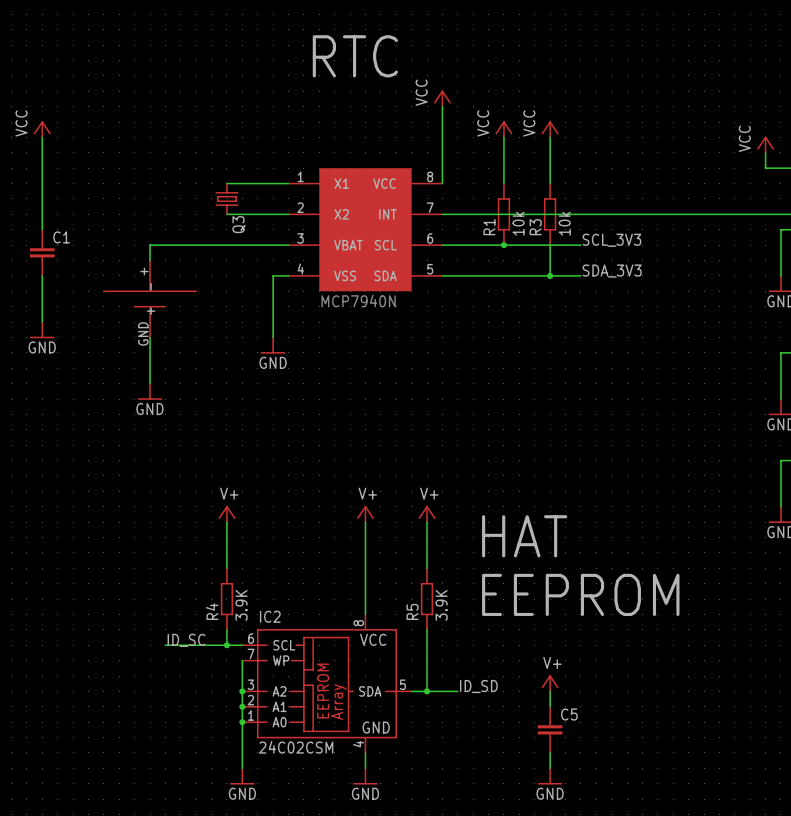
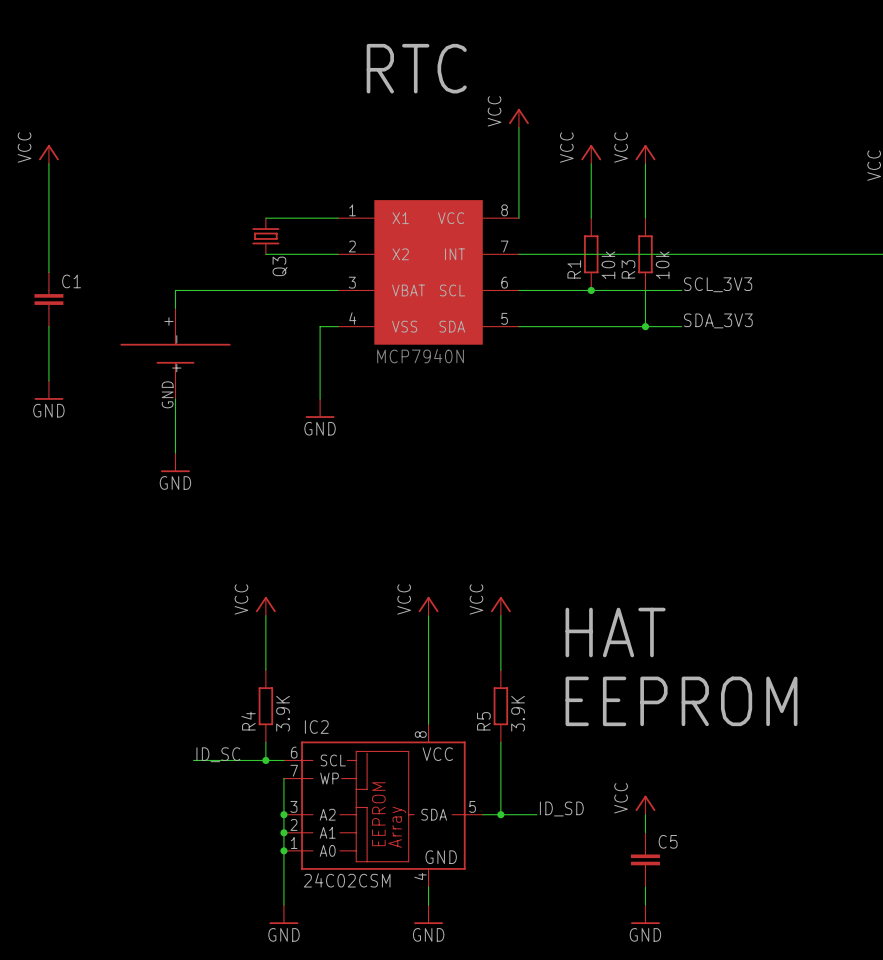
power symbol: V+ (226, 514) -> VCC (265, 606)
power symbol: V+ (365, 514) -> VCC (428, 606)
power symbol: V+ (427, 514) -> VCC (500, 606)
power symbol: V+ (550, 683) -> VCC (645, 805)

